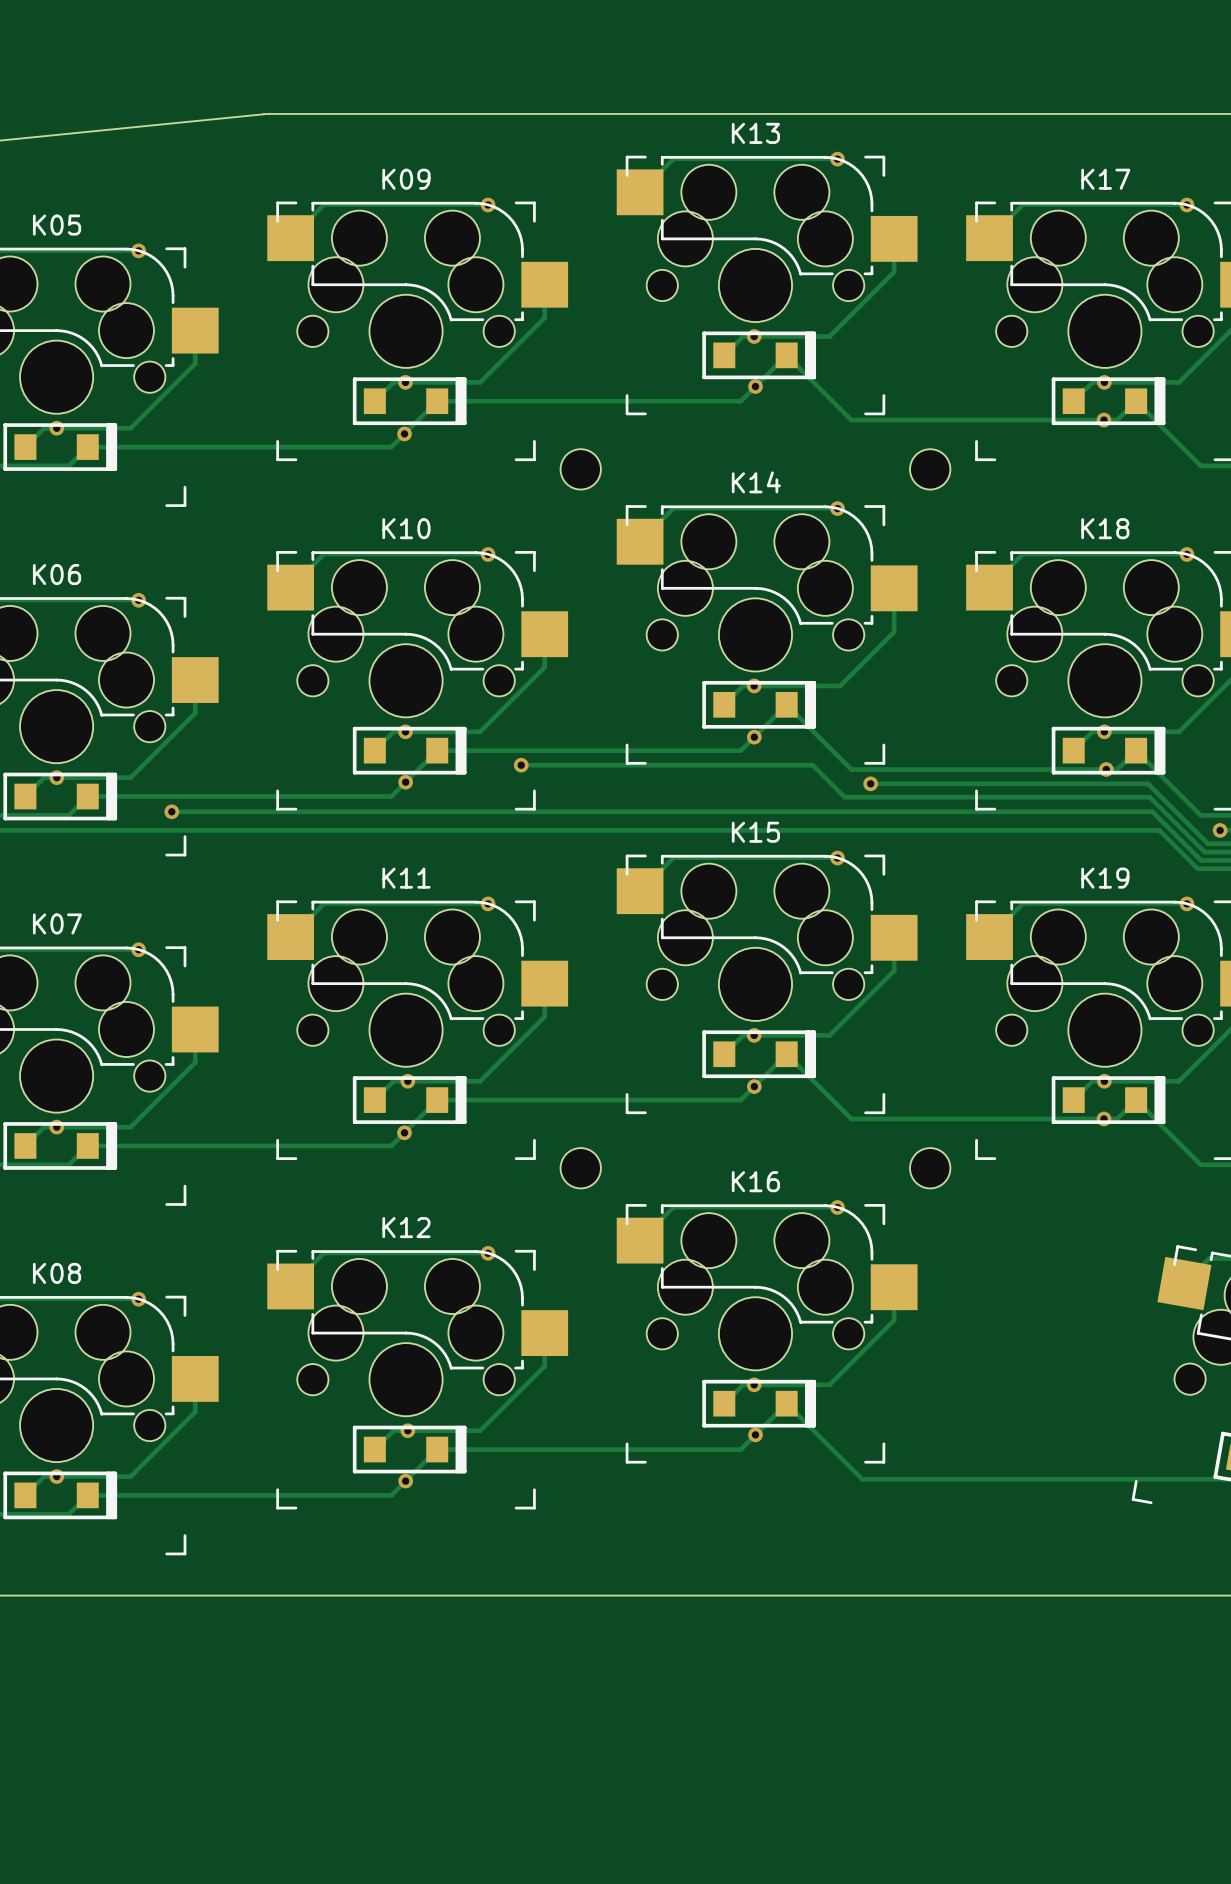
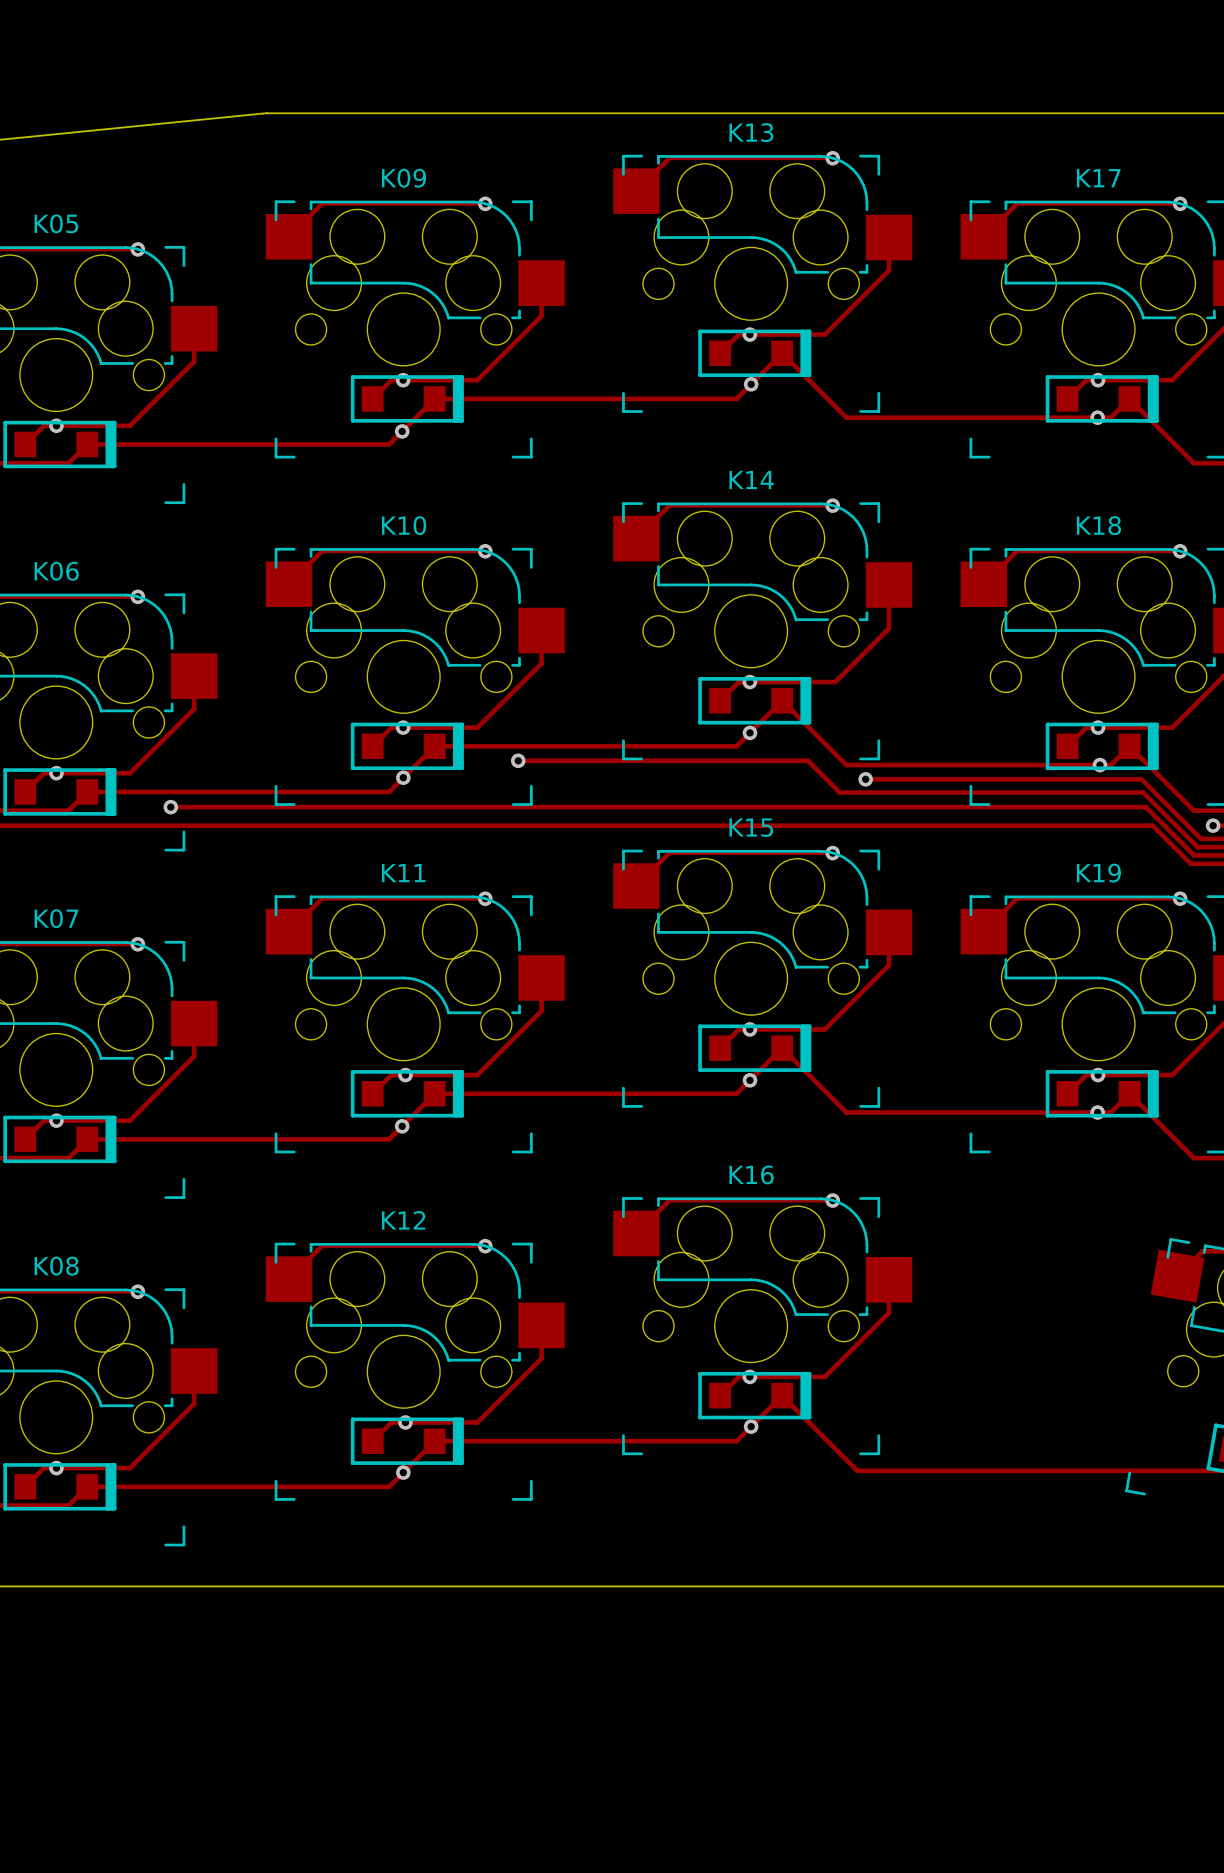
part: (580, 469) -> none
part: (930, 469) -> none
part: (580, 1168) -> none
part: (930, 1168) -> none

